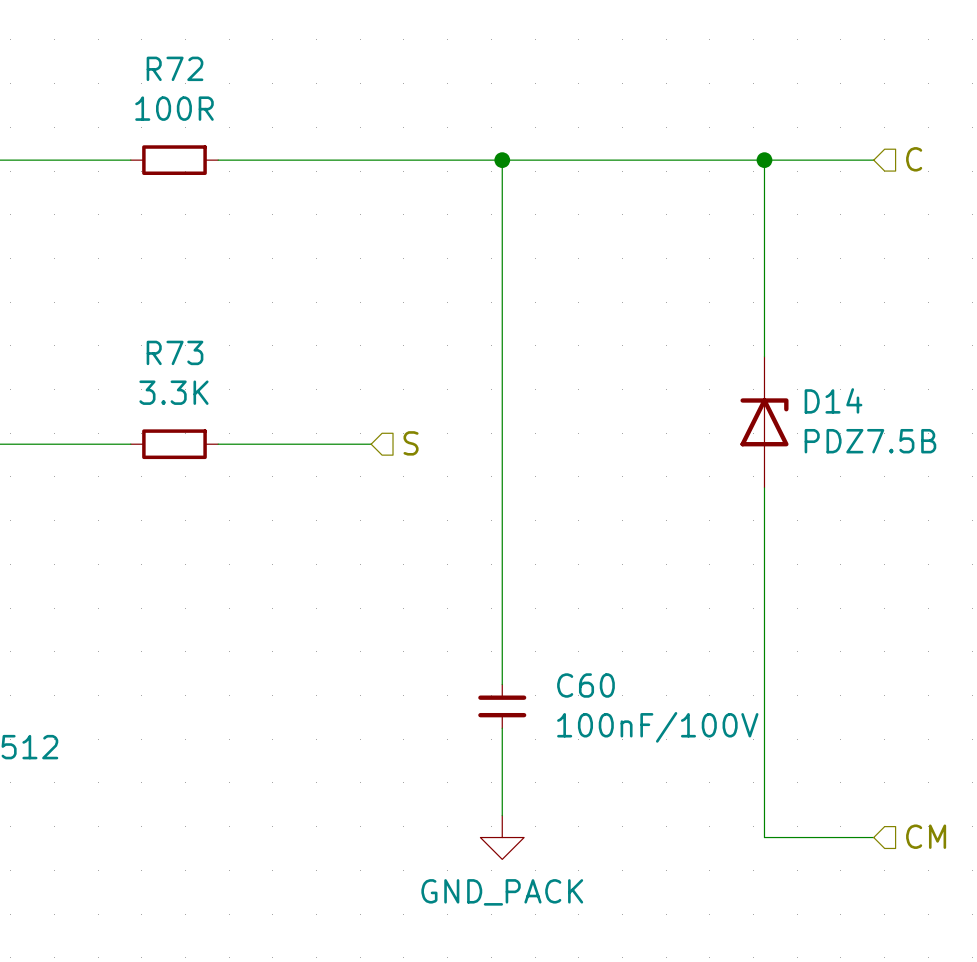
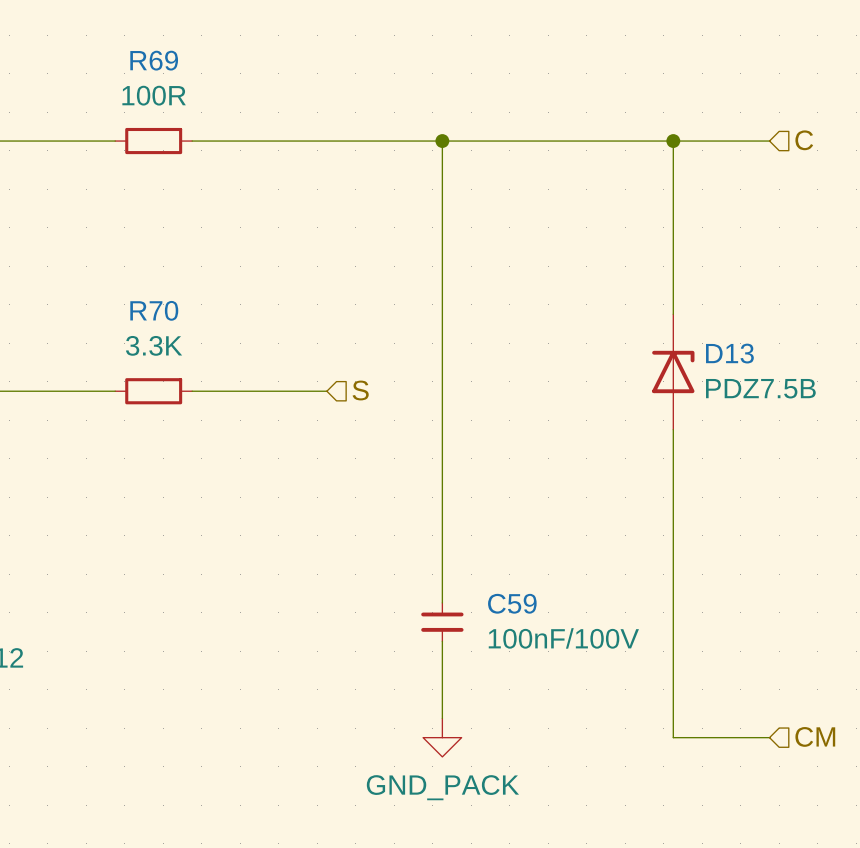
R72 name: R72 (175, 68) -> R69 (154, 60)
R73 name: R73 (175, 352) -> R70 (154, 310)
D14 name: D14 (833, 400) -> D13 (729, 353)
C60 name: C60 (585, 685) -> C59 (512, 603)

